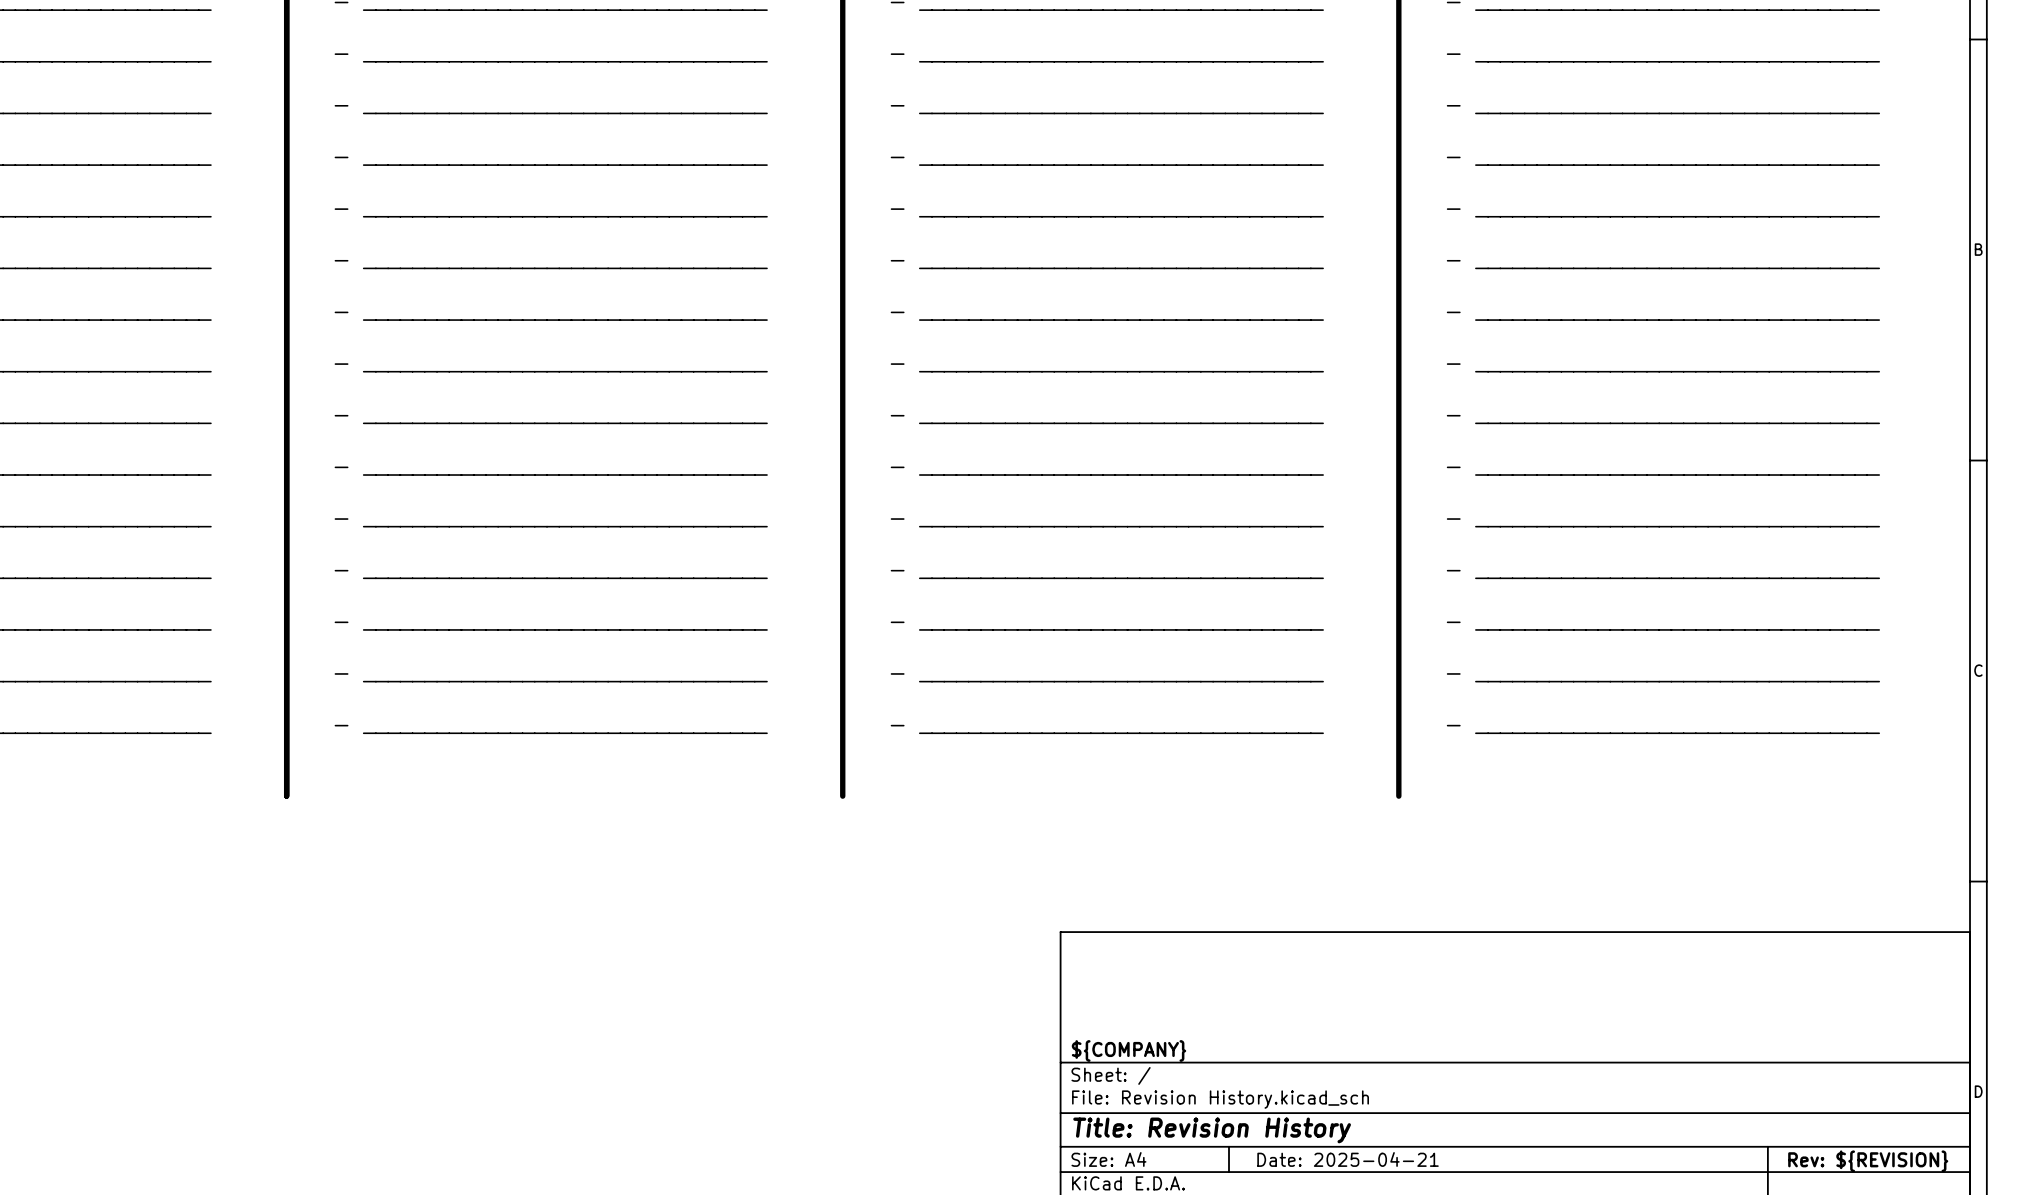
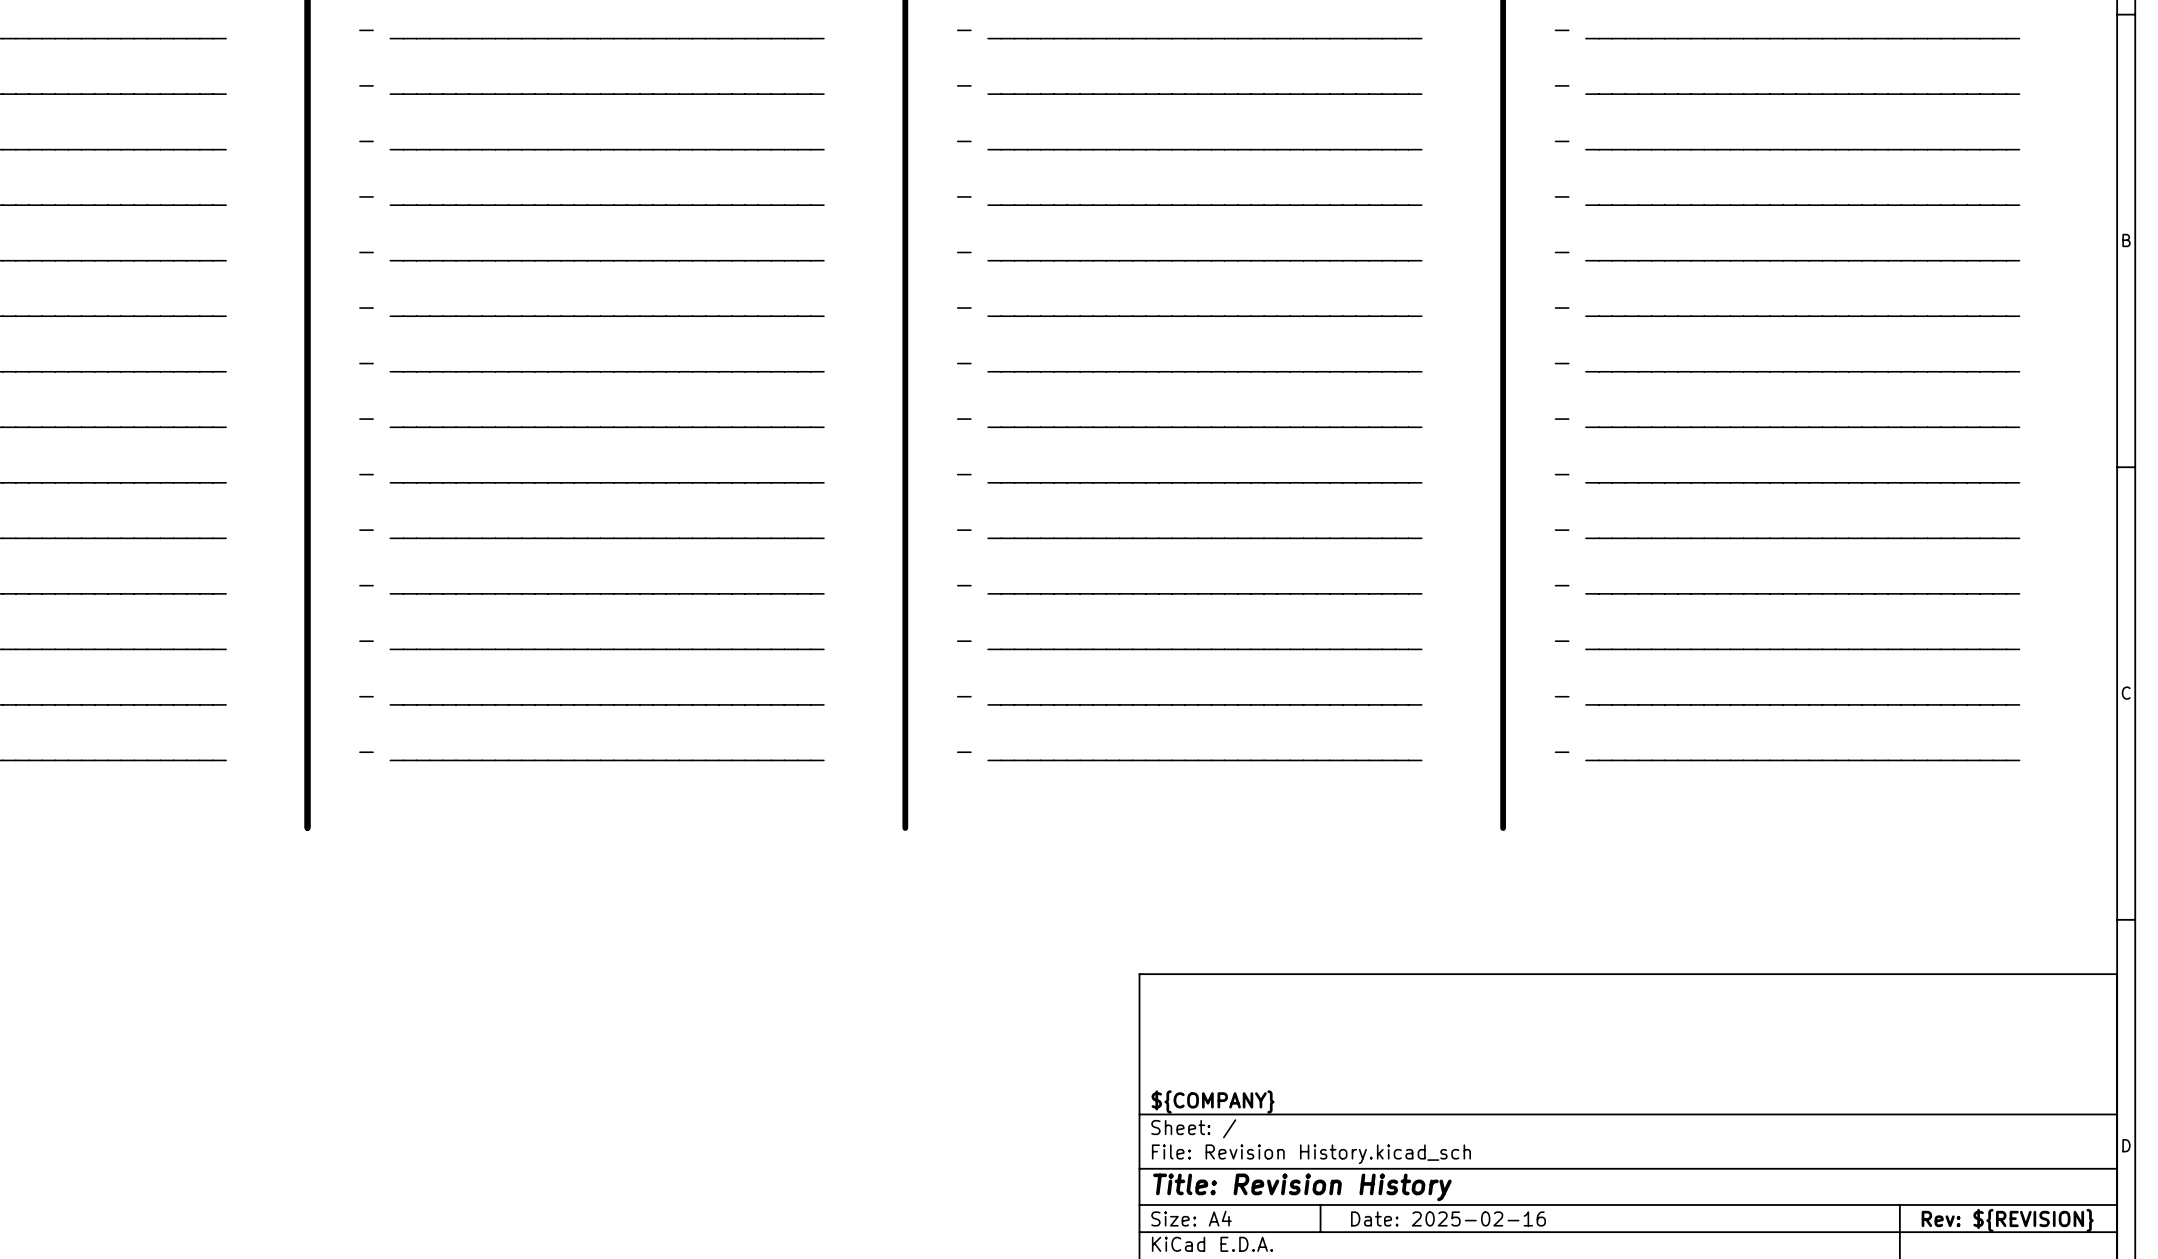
title block: Date: 2025-04-21 (1348, 1159) -> Date: 2025-02-16 (1448, 1218)

